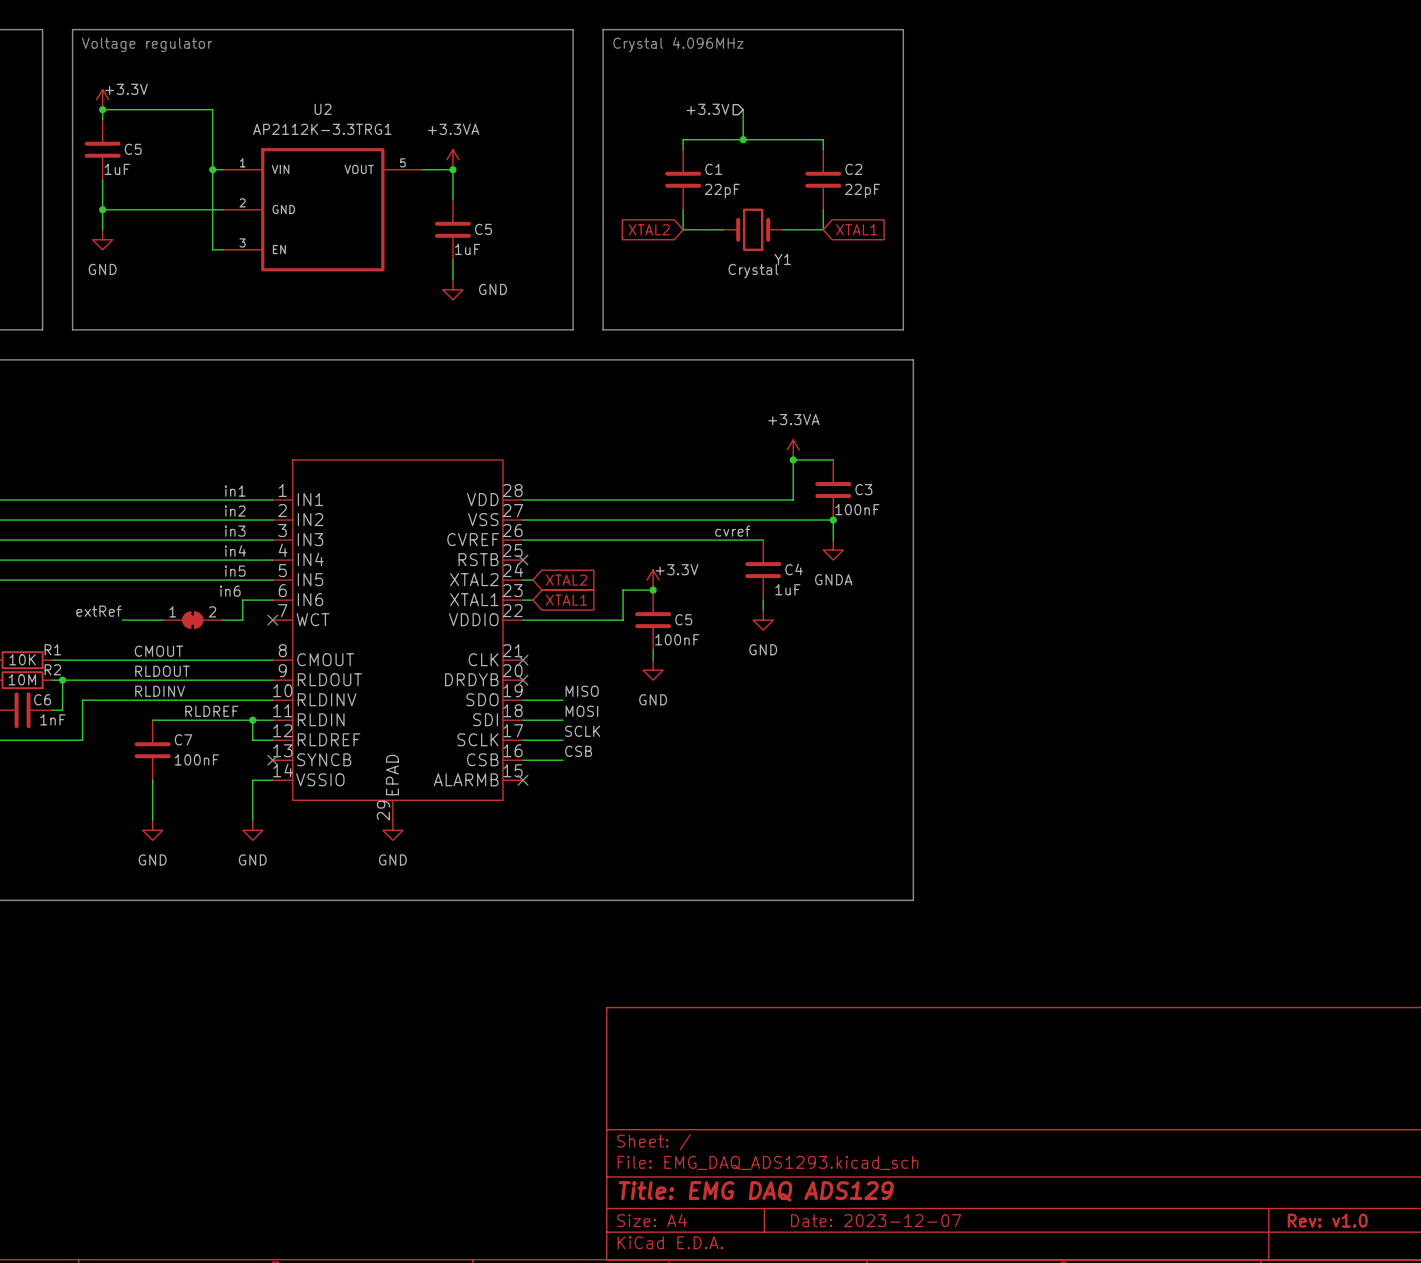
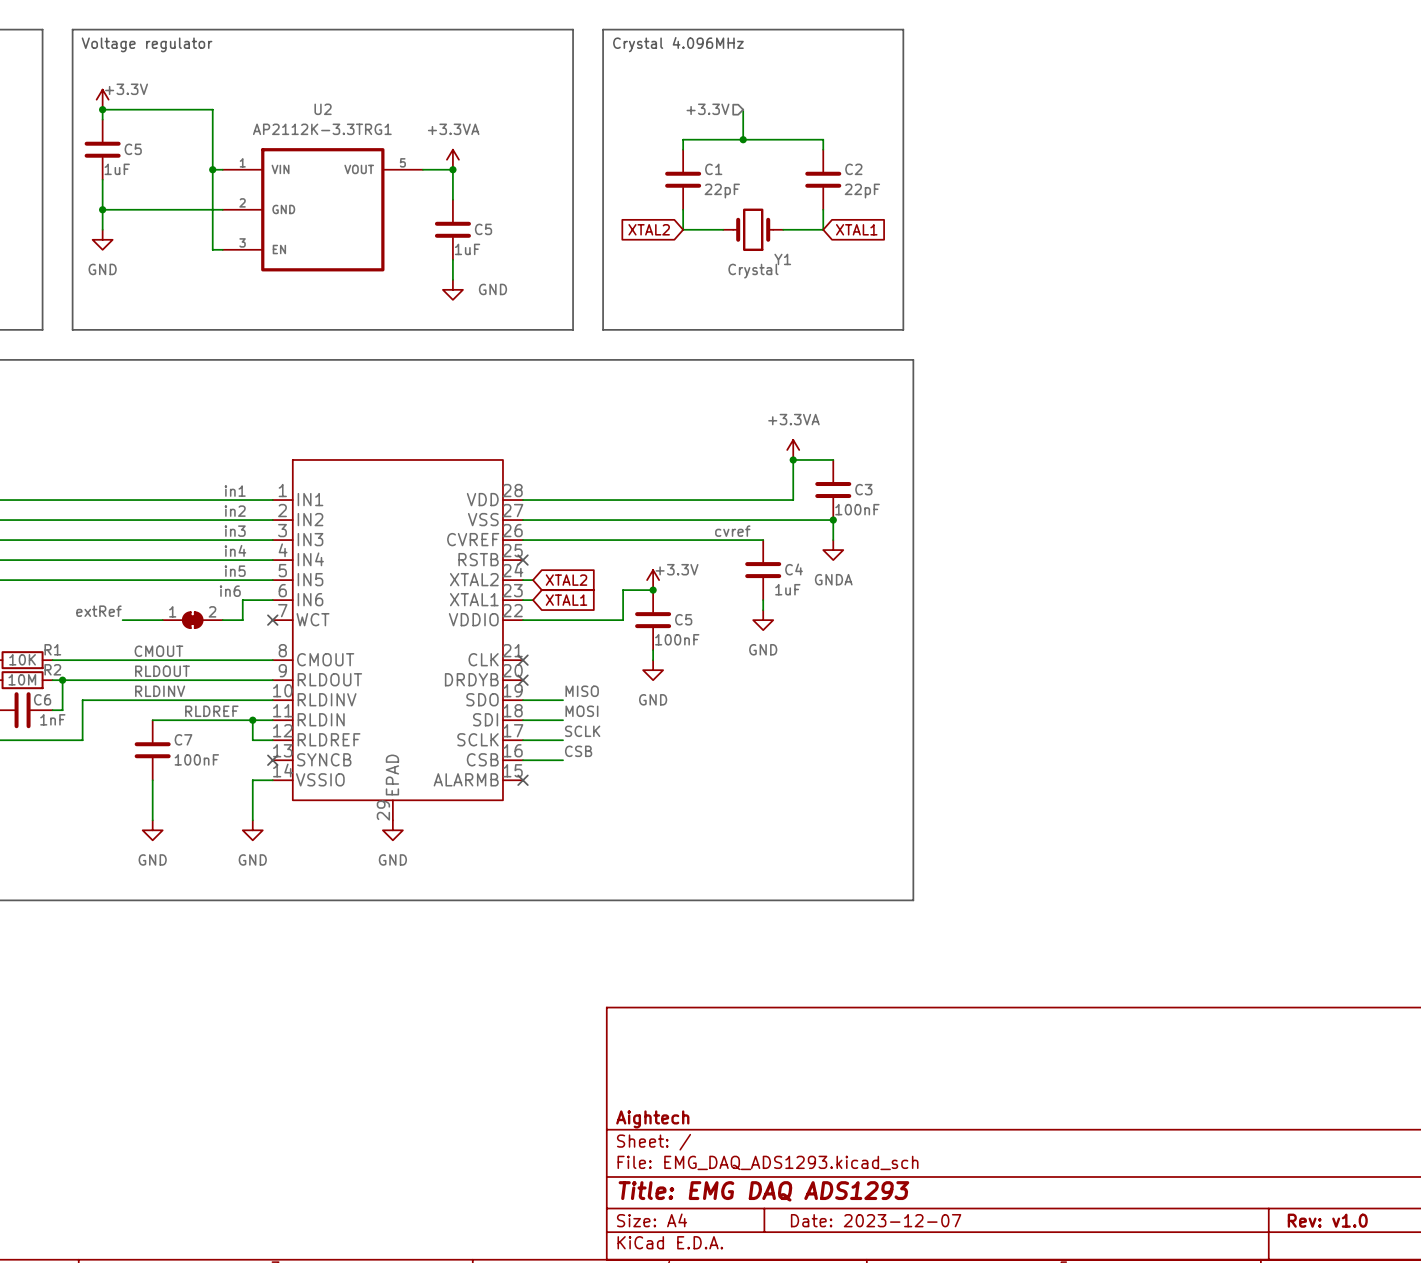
title block: none -> Aightech (652, 1119)
title block: Title: EMG DAQ ADS129 (756, 1191) -> Title: EMG DAQ ADS1293 (763, 1191)

